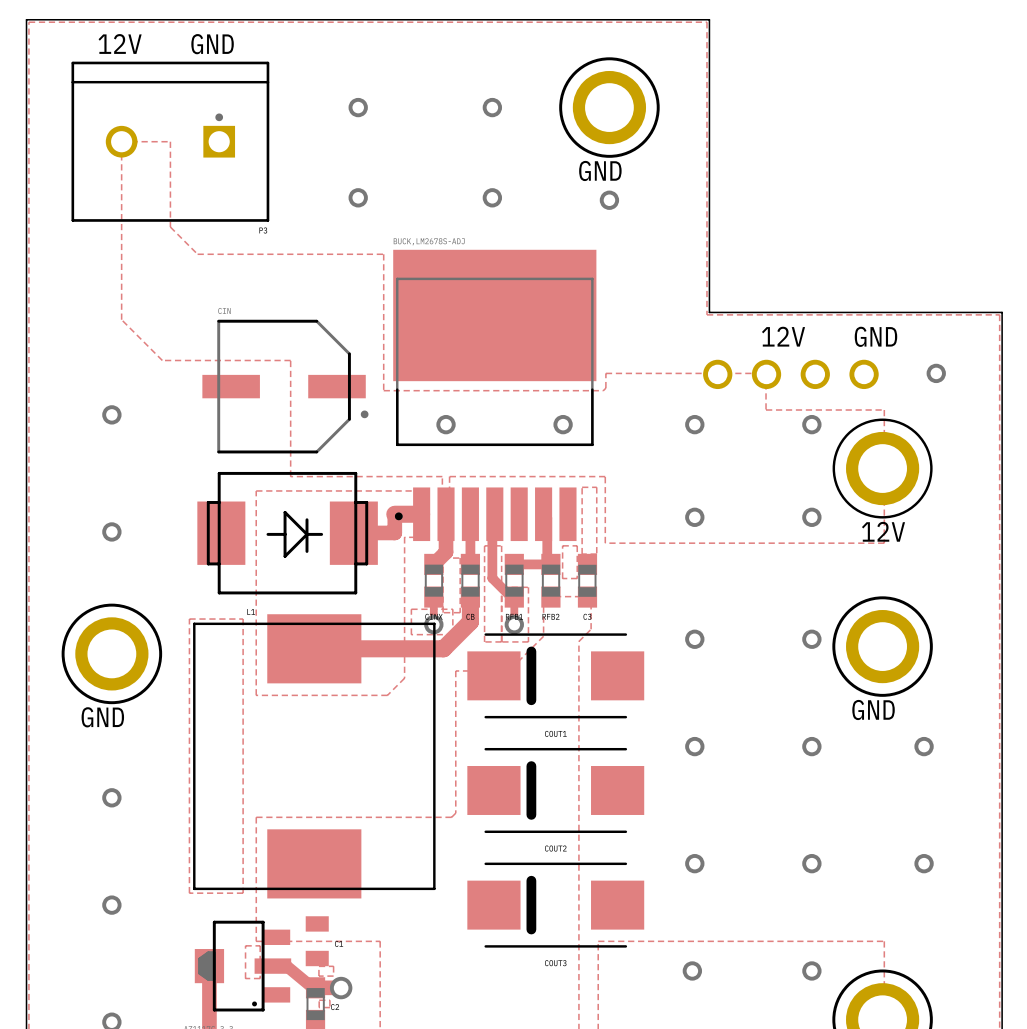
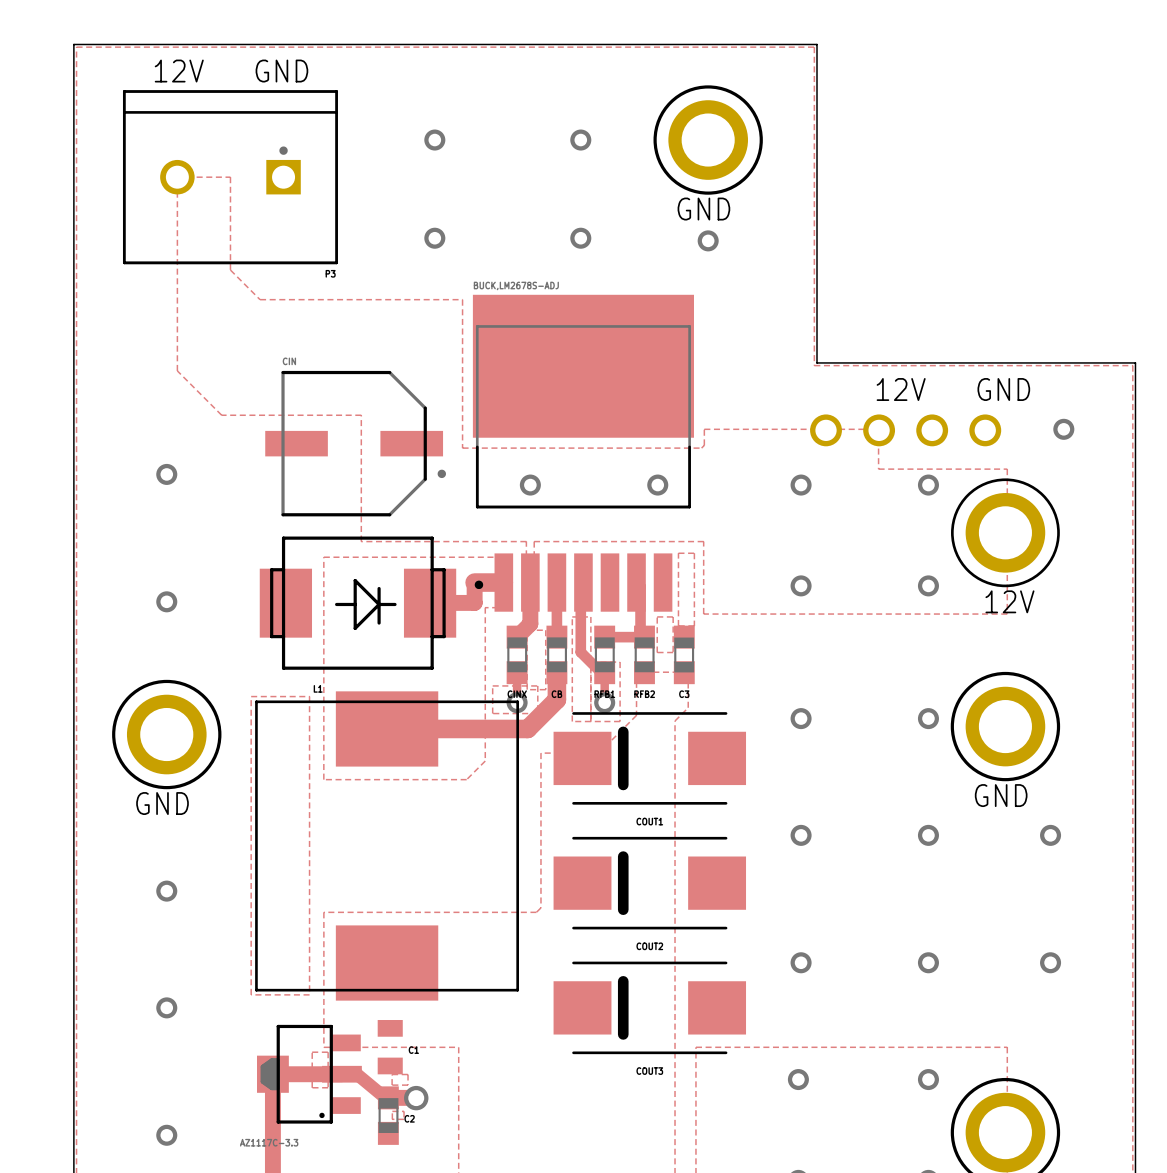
track: none -> (272, 1074) (341, 1074)

